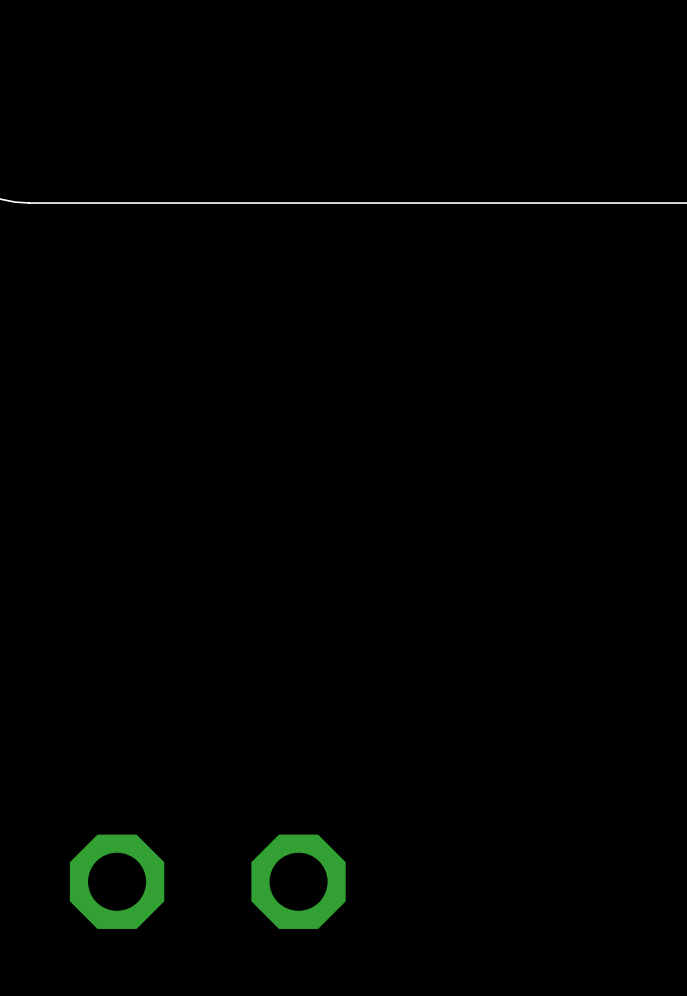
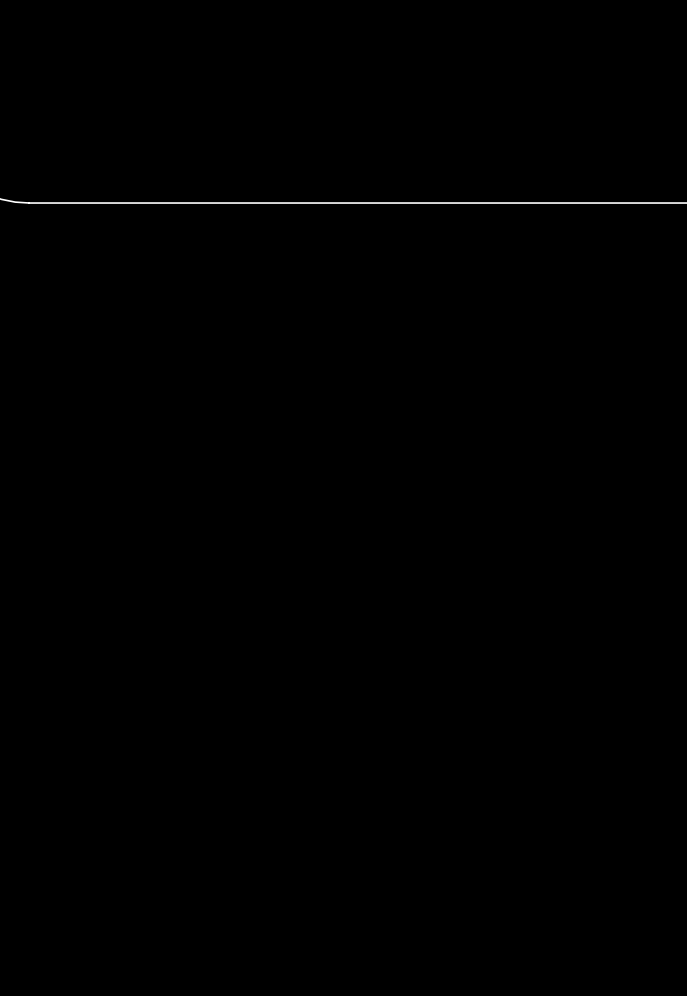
part: (207, 881) -> none

